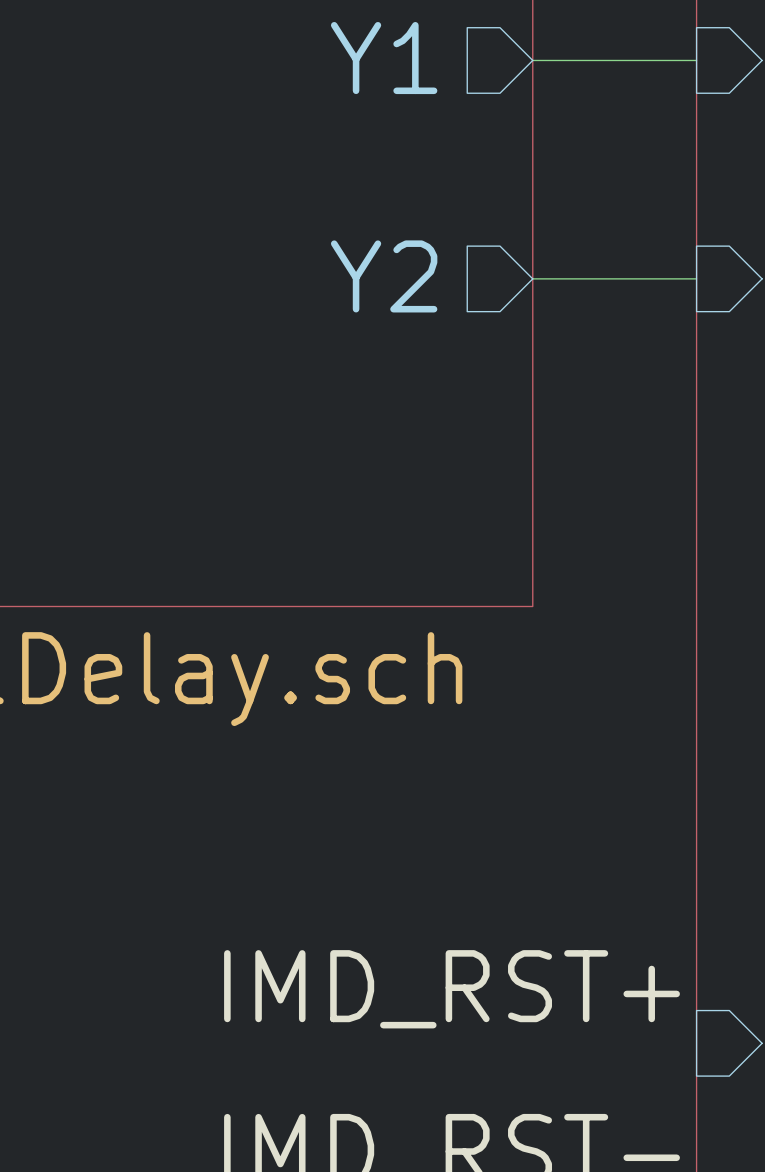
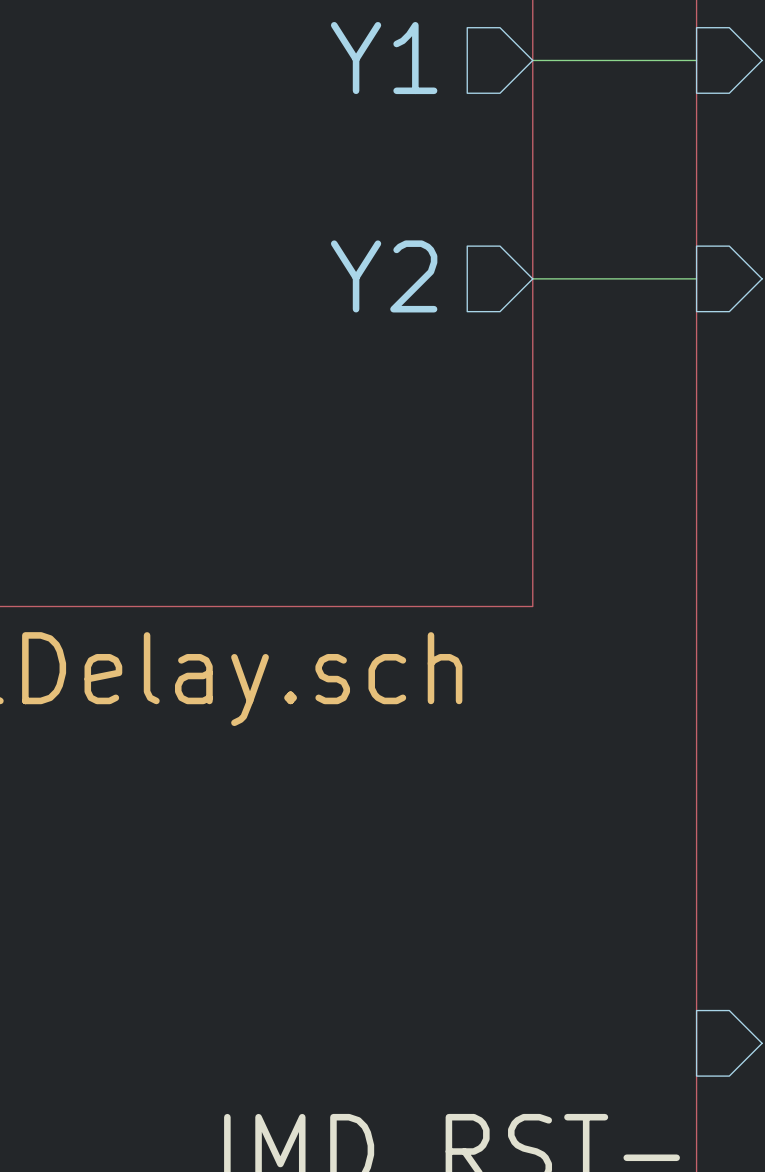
label: IMD_RST+ (452, 989) -> none

